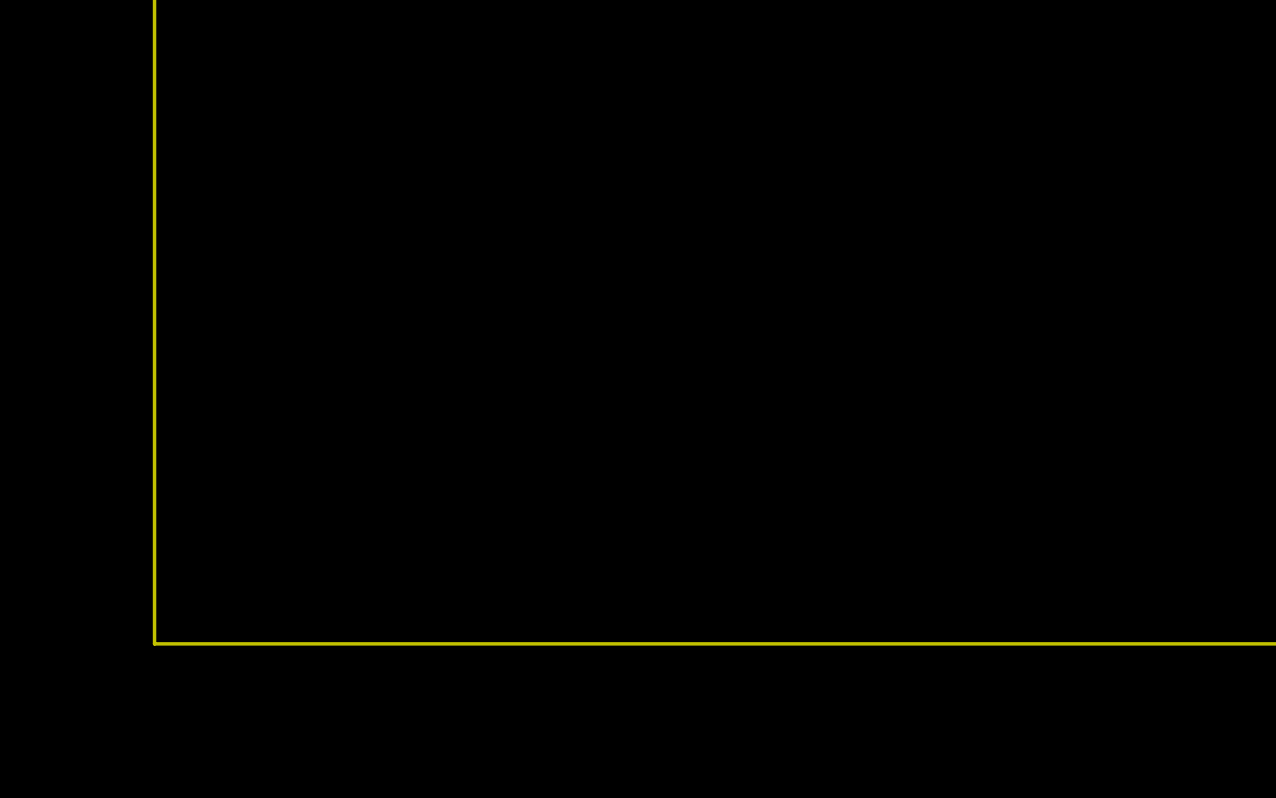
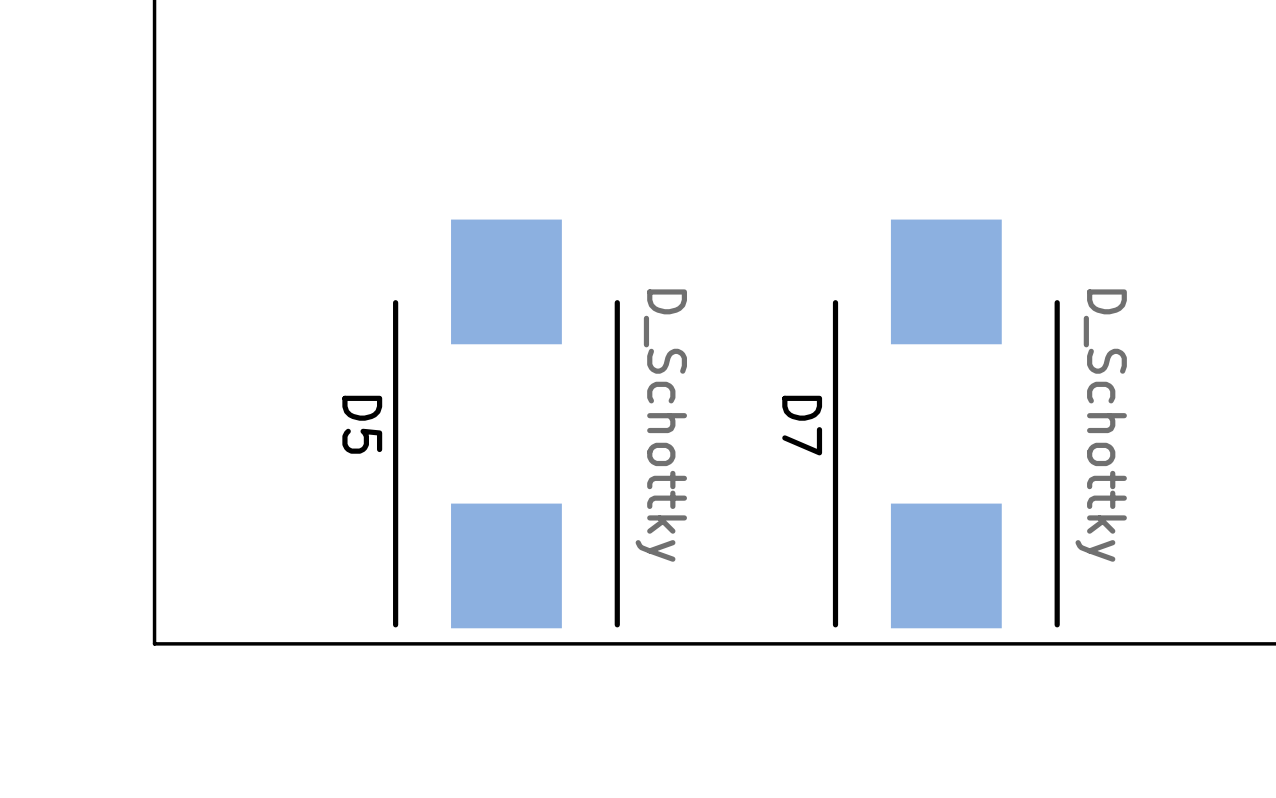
D5: none -> D_Schottky (506, 423)
D7: none -> D_Schottky (946, 423)

